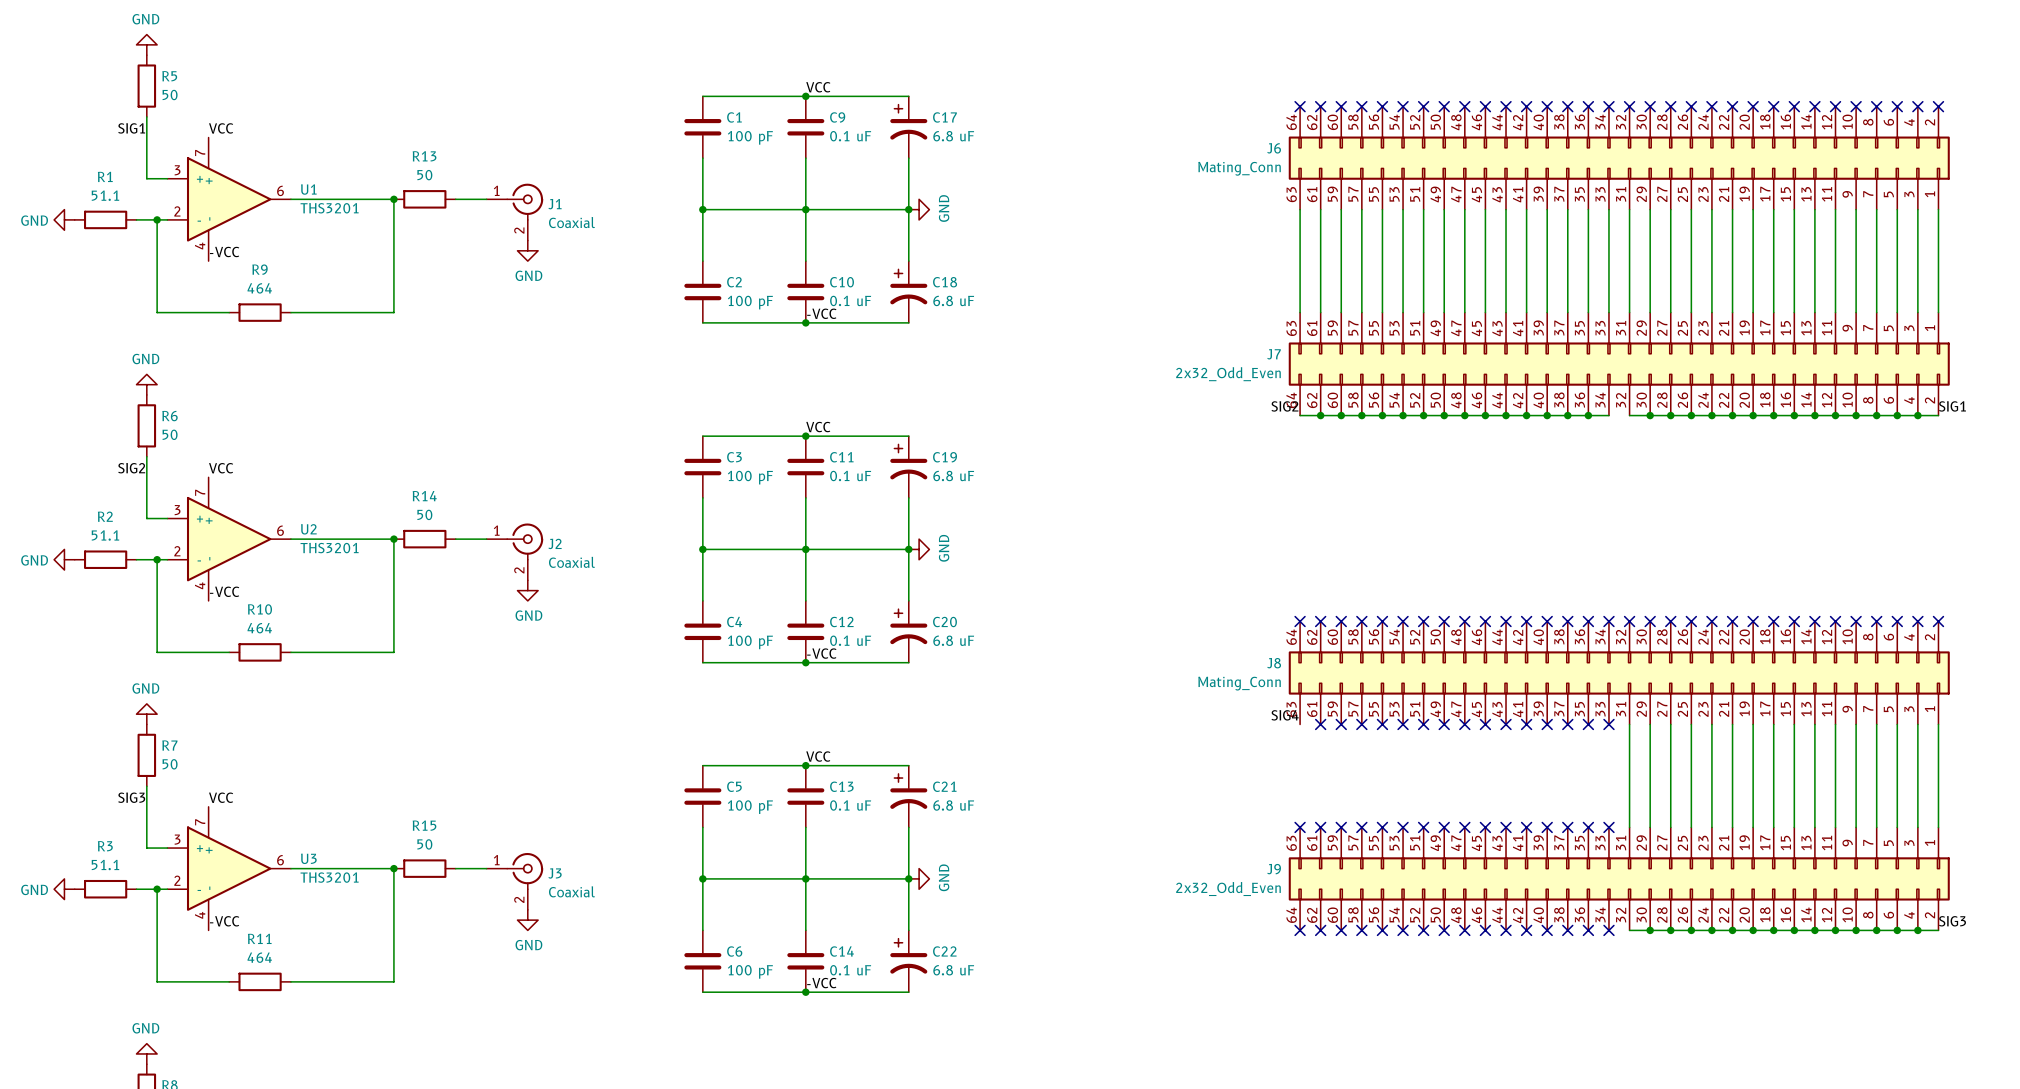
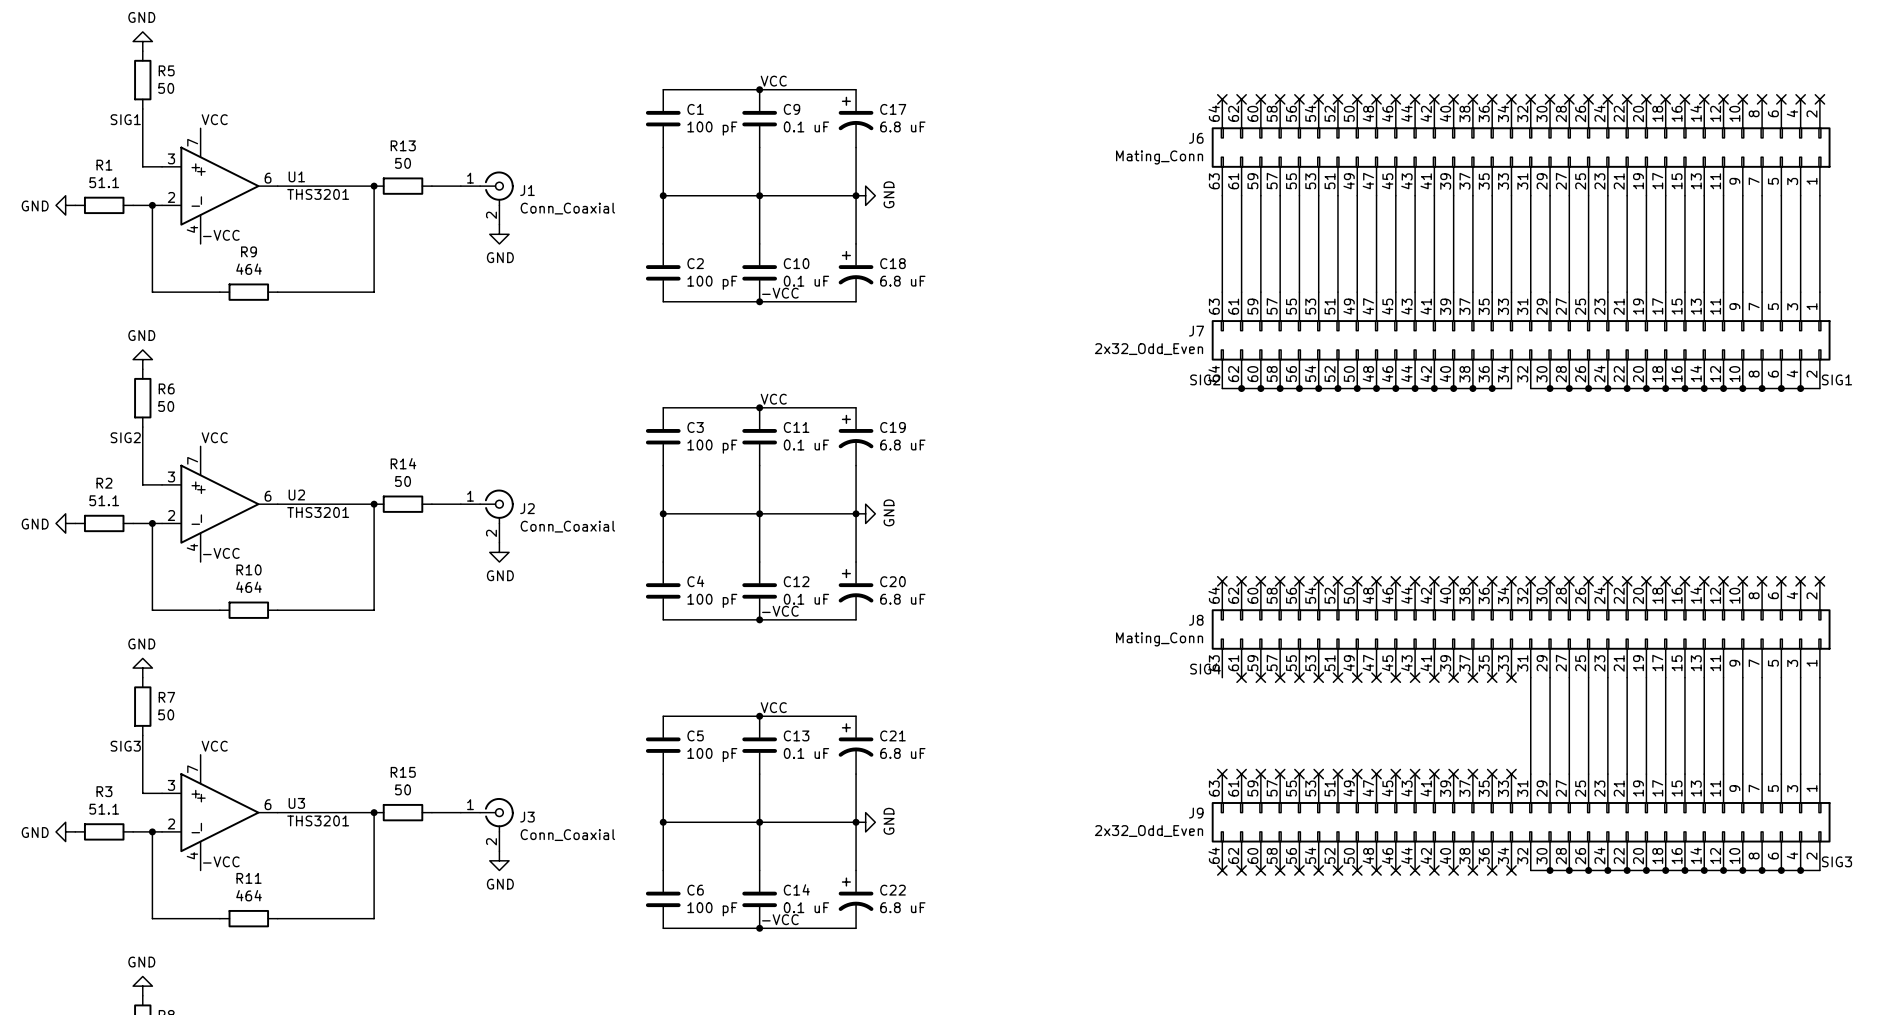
J1 value: Coaxial (571, 222) -> Conn_Coaxial (567, 208)
J2 value: Coaxial (571, 562) -> Conn_Coaxial (567, 526)
J3 value: Coaxial (571, 891) -> Conn_Coaxial (567, 835)

